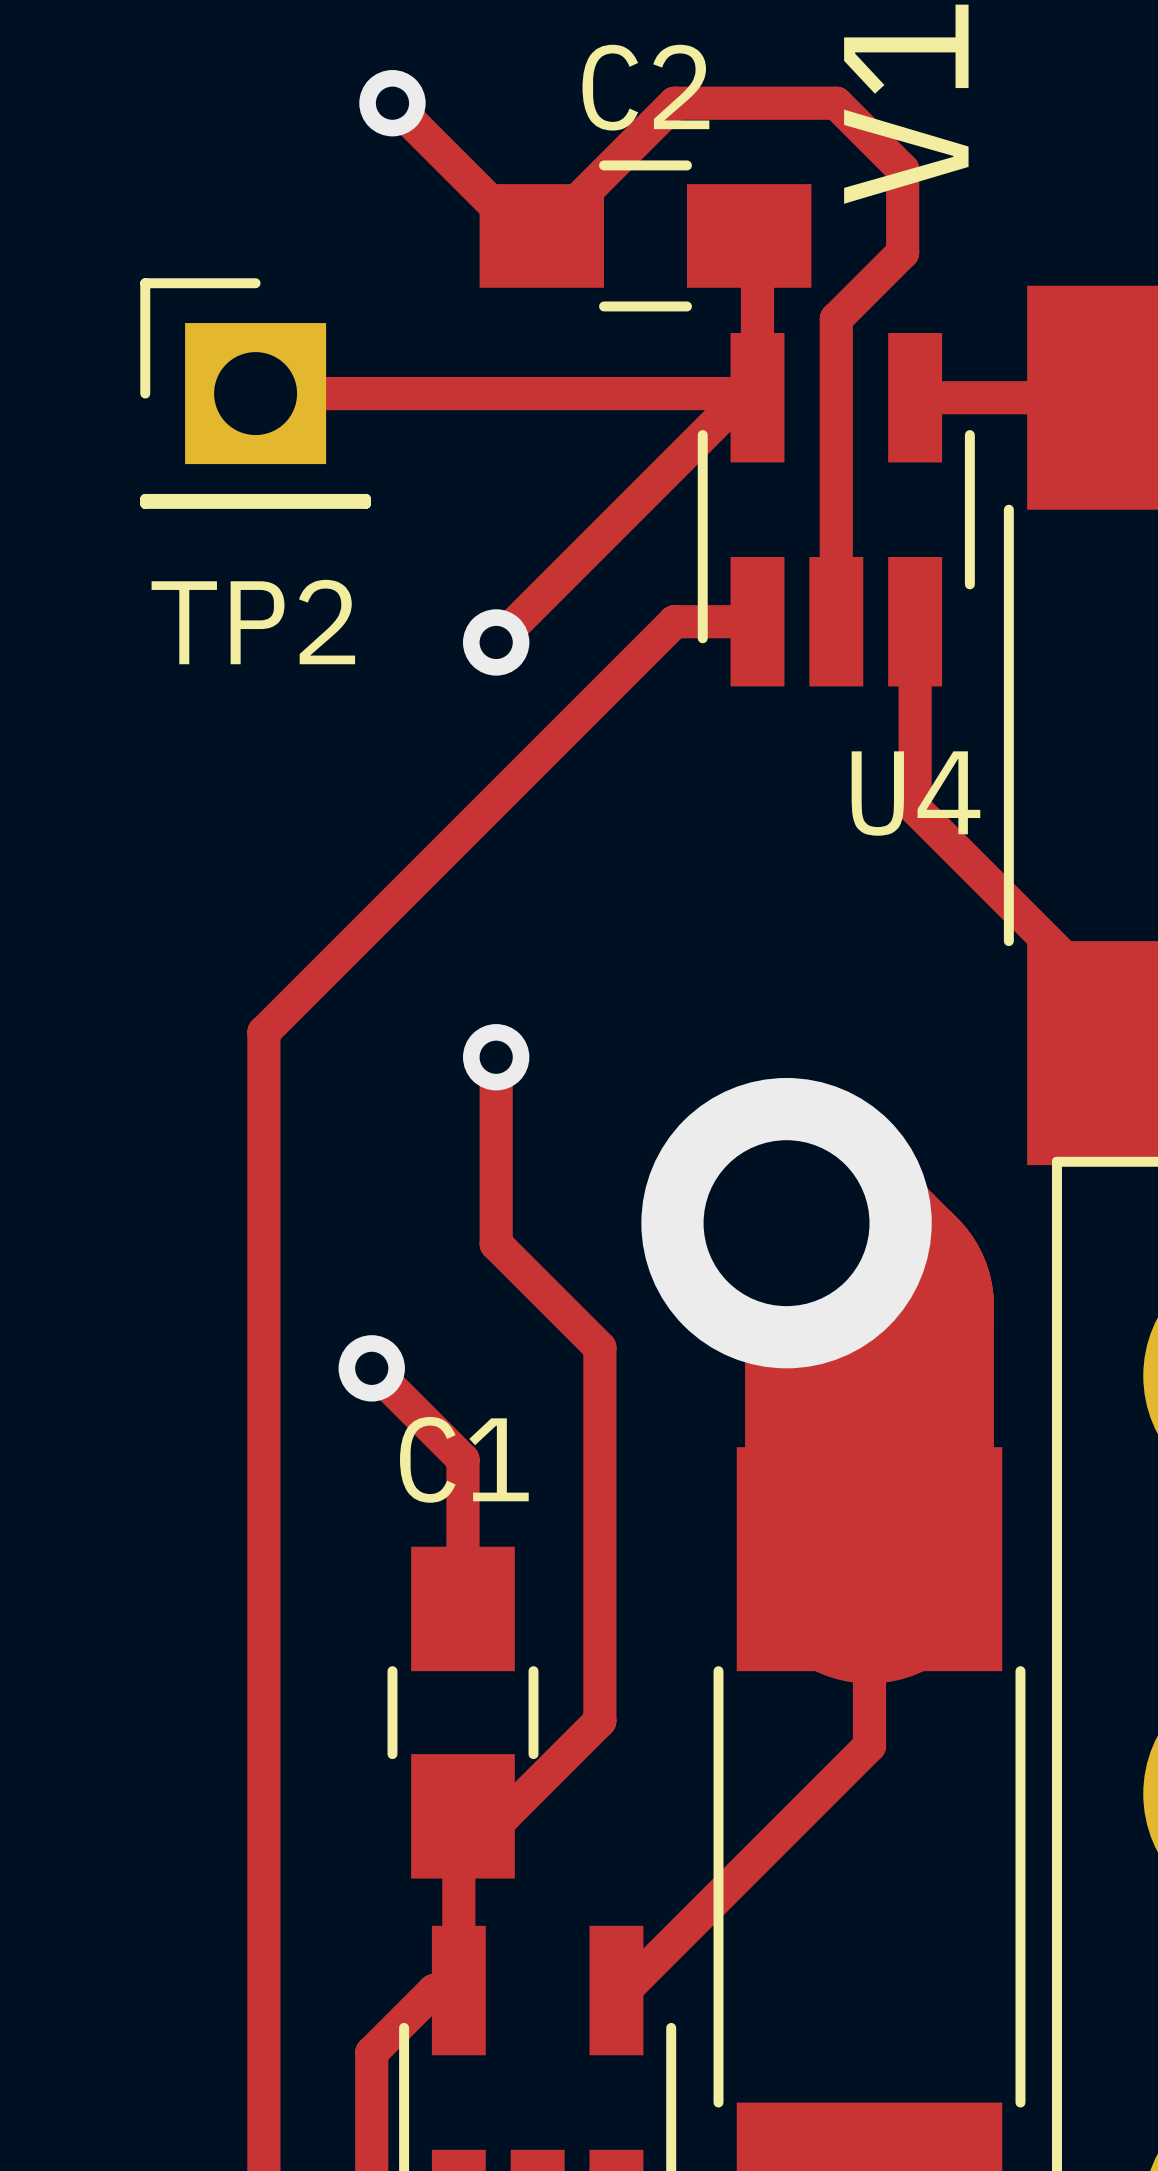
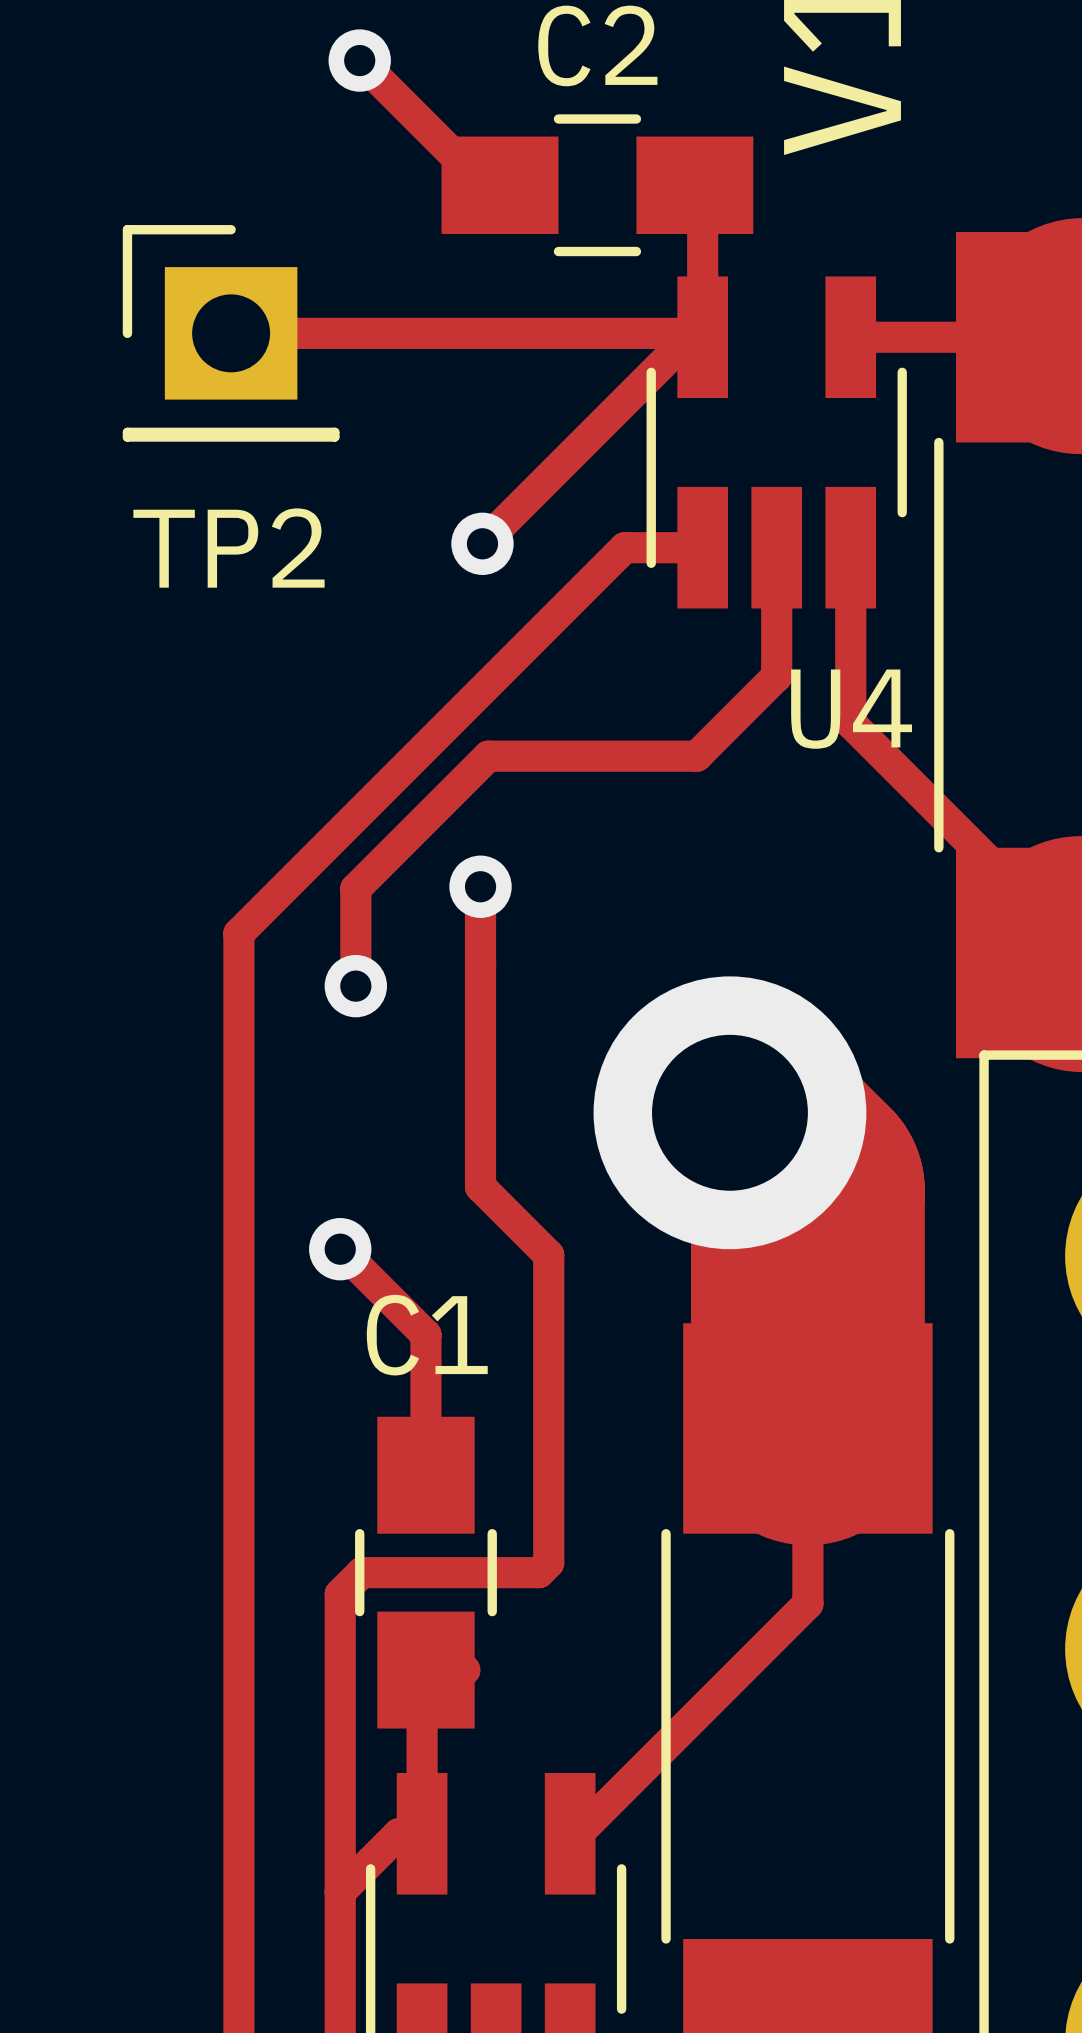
track: (541, 235) (674, 103) (836, 103) (902, 169) (902, 252) (836, 318) (836, 621) -> (355, 986) (355, 888) (488, 756) (696, 756) (776, 676) (776, 547)
track: (740, 397) (496, 642) -> (689, 337) (482, 543)
via position: (496, 642) -> (482, 543)
track: none -> (480, 886) (480, 1186) (548, 1255) (548, 1562) (539, 1572) (361, 1572) (340, 1594) (340, 1892)
via: none -> (480, 886)
track: (496, 1057) (496, 1243) (599, 1347) (599, 1720) (504, 1816) -> none
via: (496, 1057) -> none
via: none -> (355, 986)

